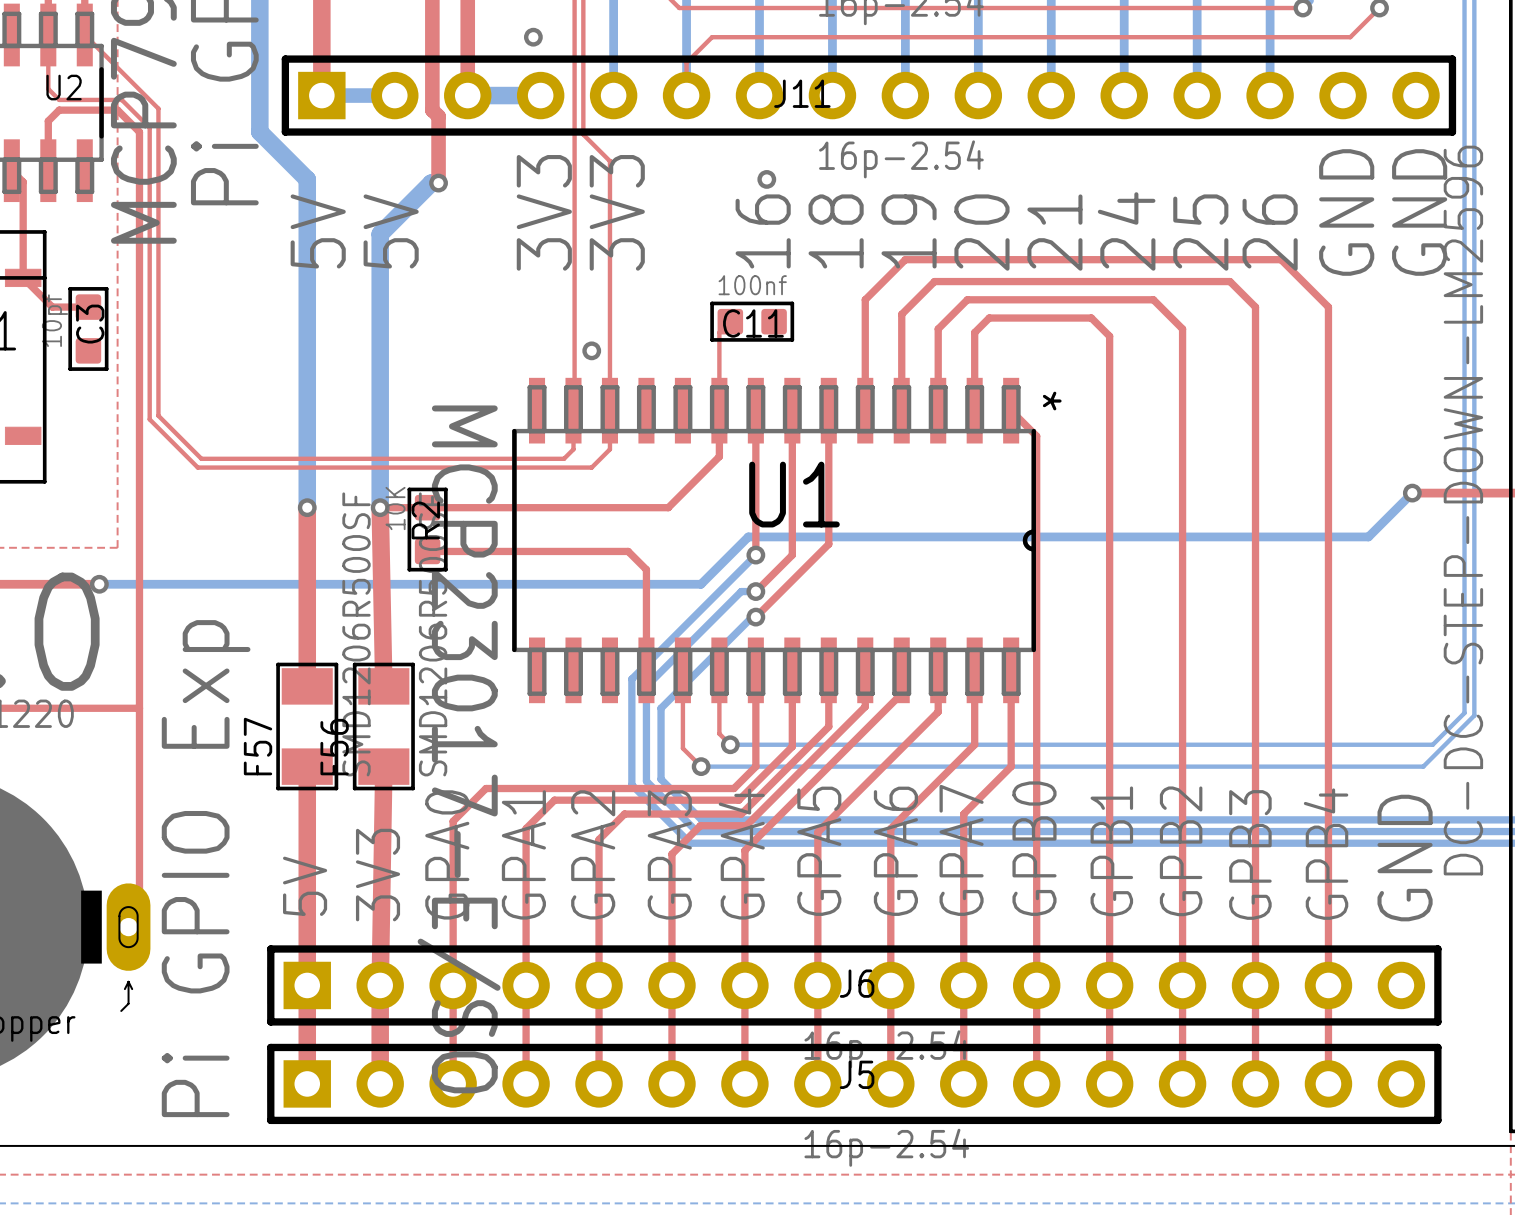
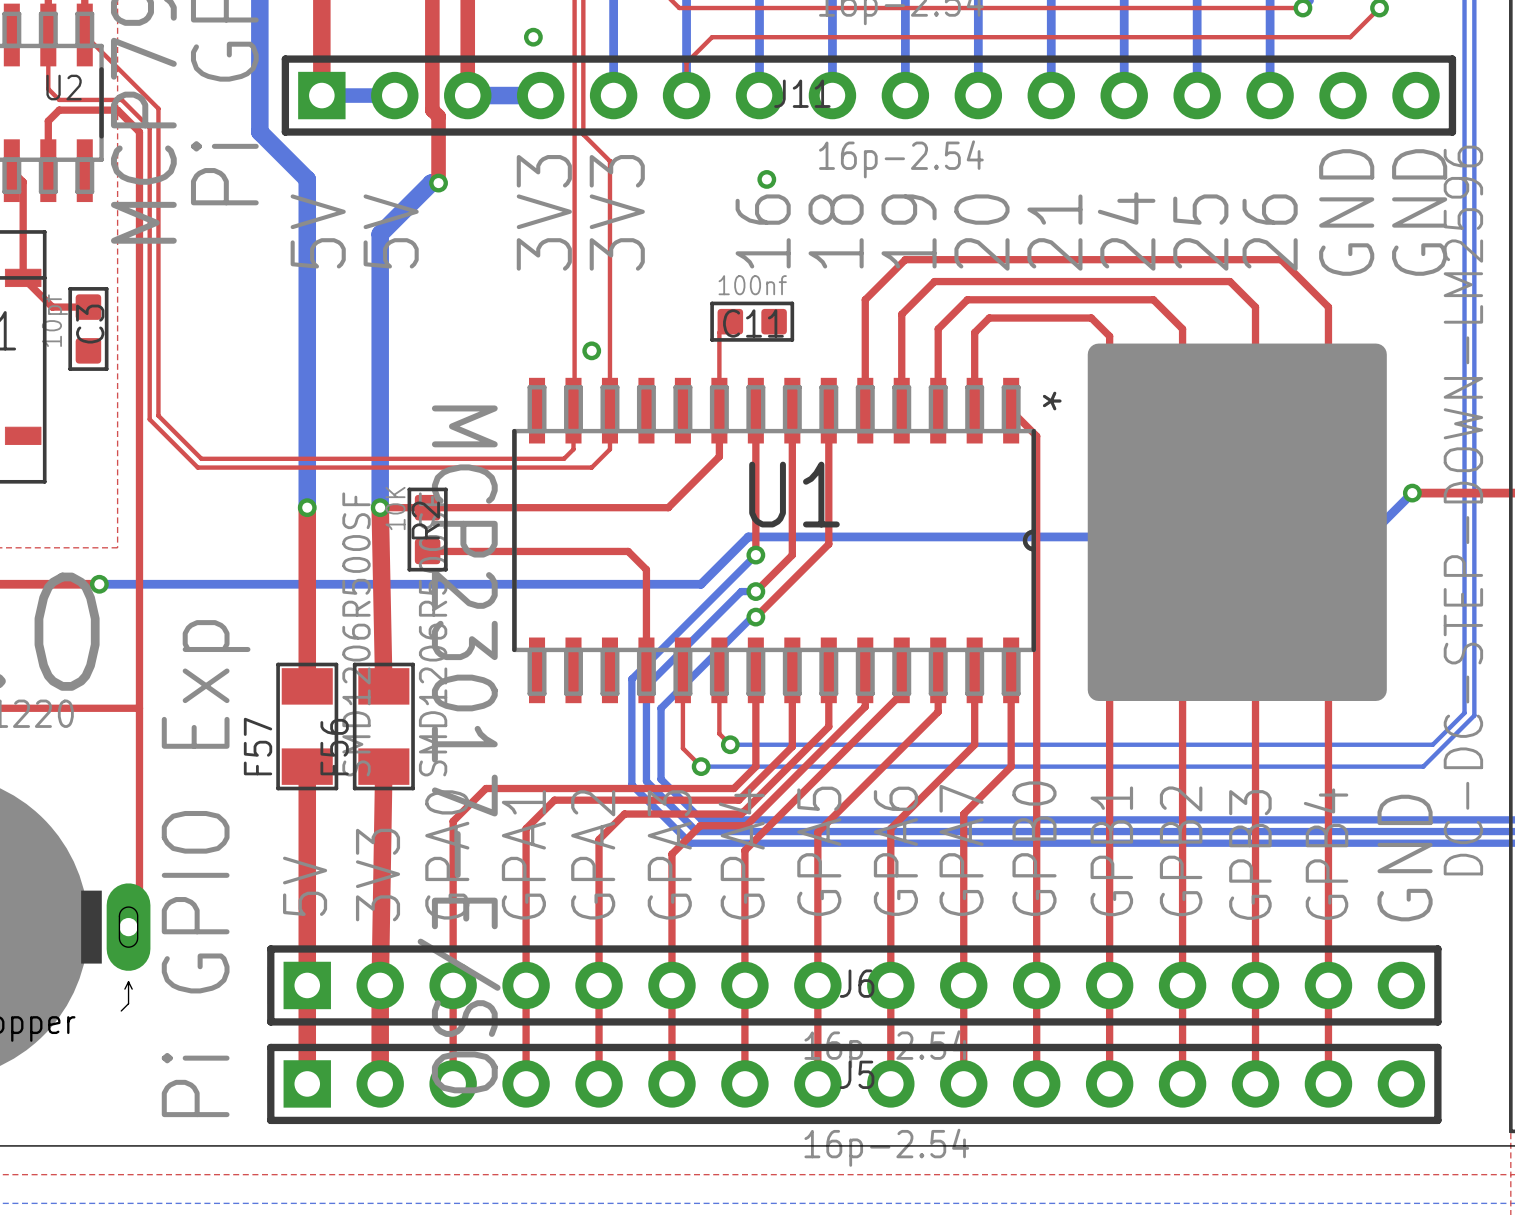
drawing: none -> [1087, 343, 1387, 701]

